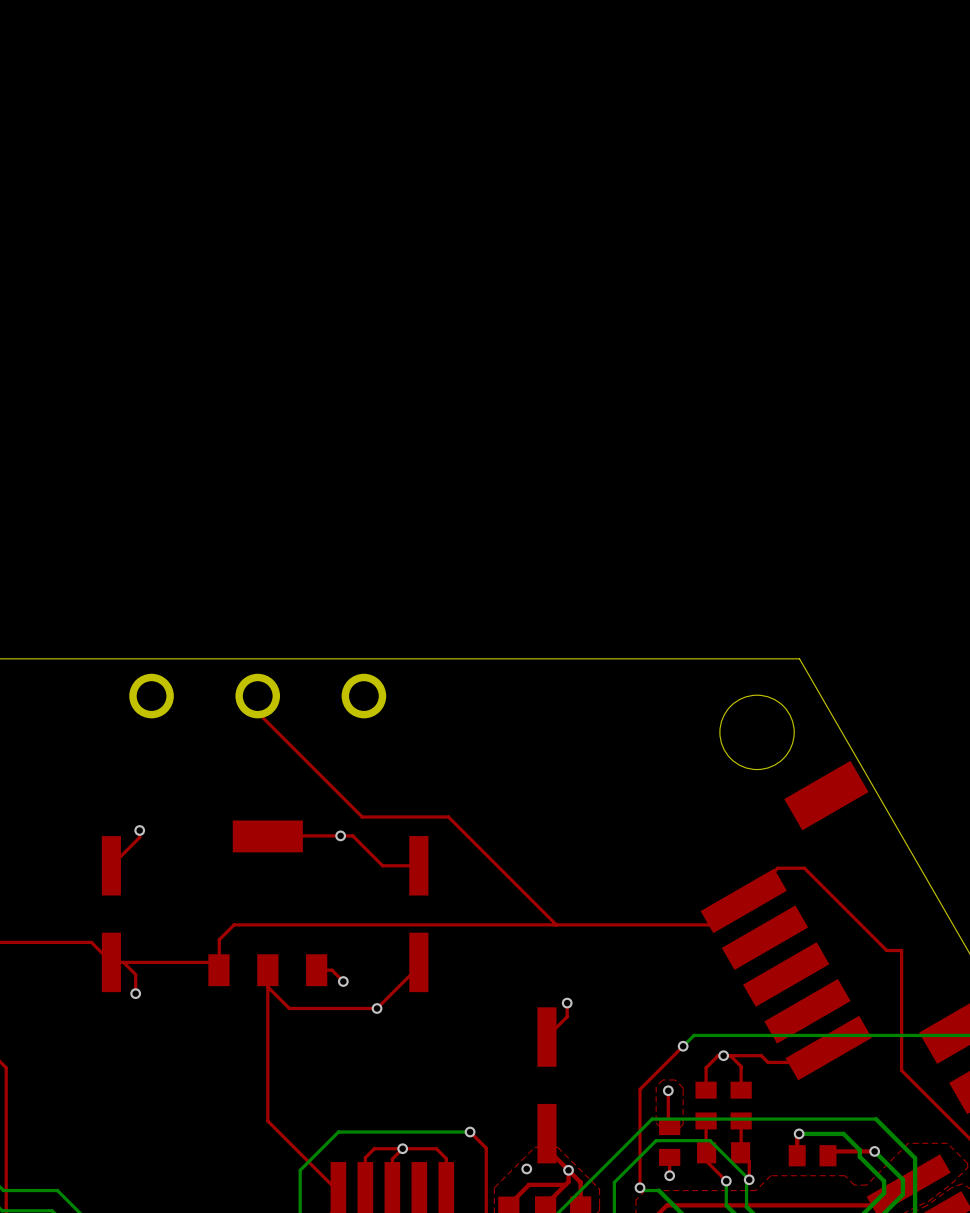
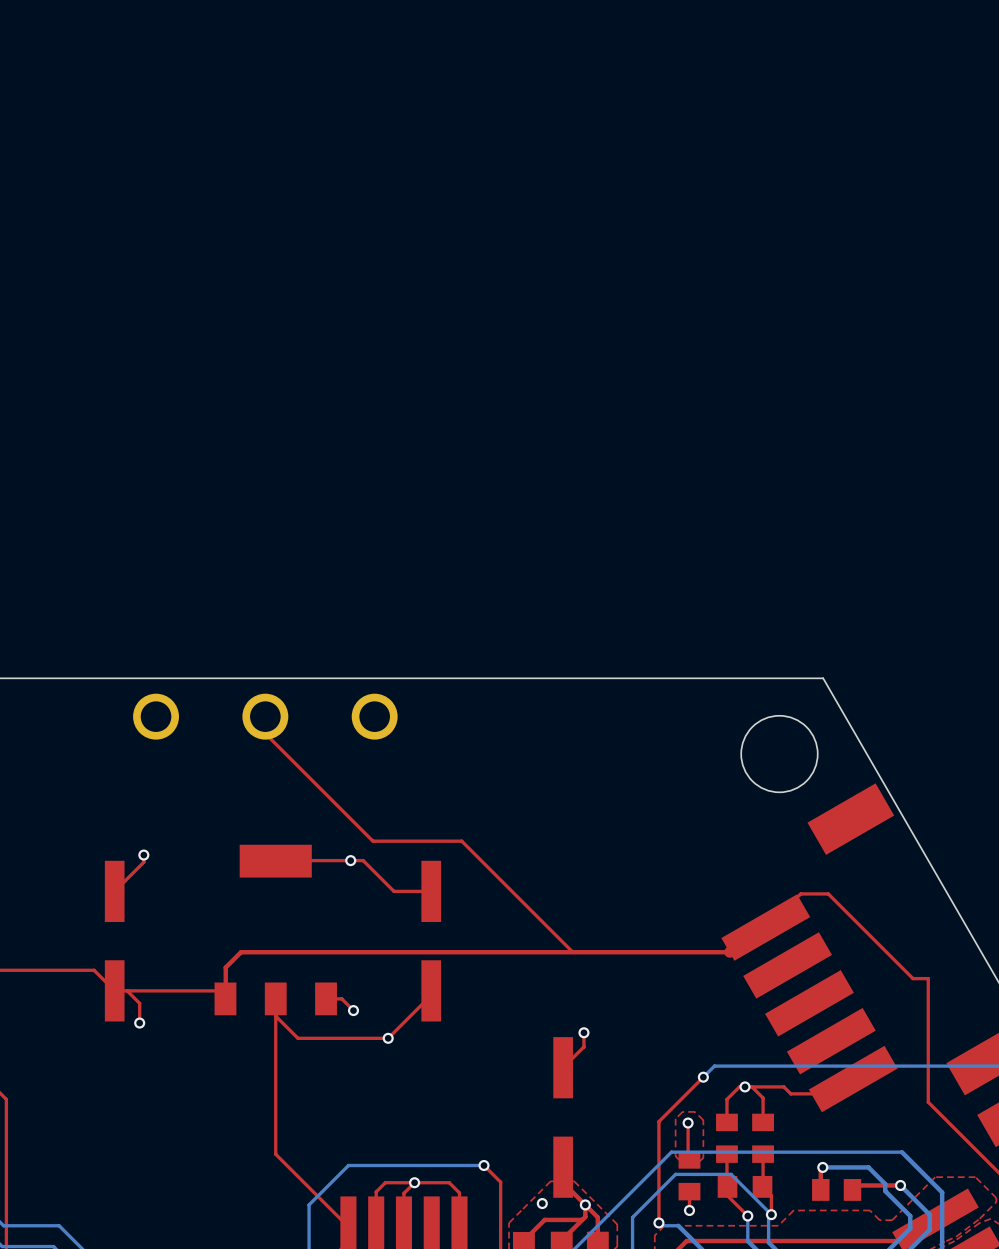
top track width: thin (734, 899) (708, 924) (234, 924) (219, 939) (219, 969) -> thick (755, 926) (729, 952) (241, 952) (225, 967) (225, 998)

